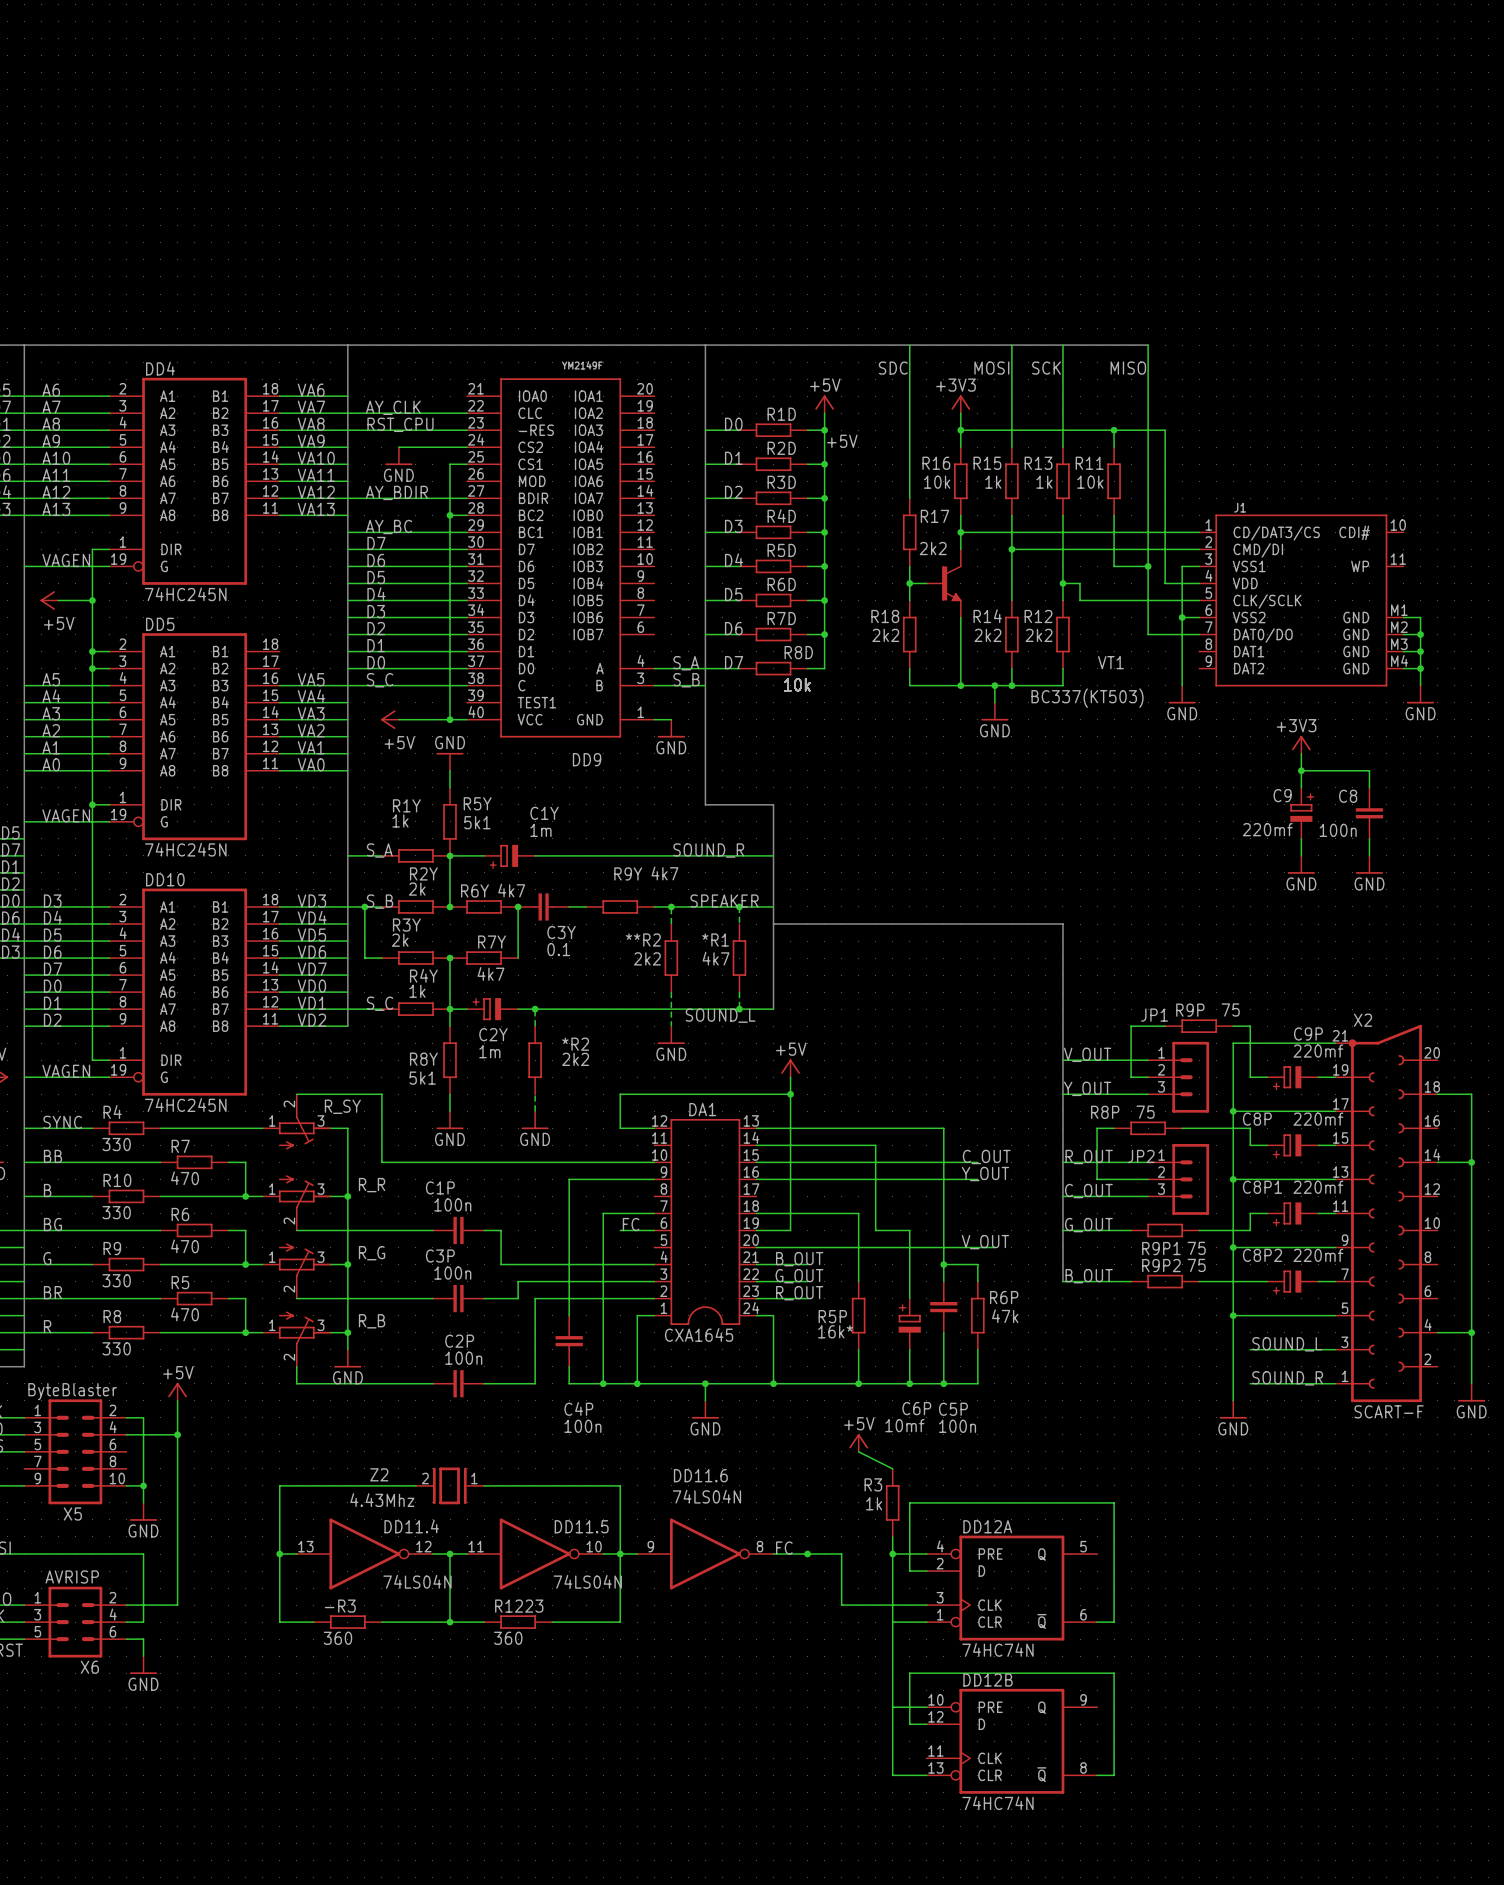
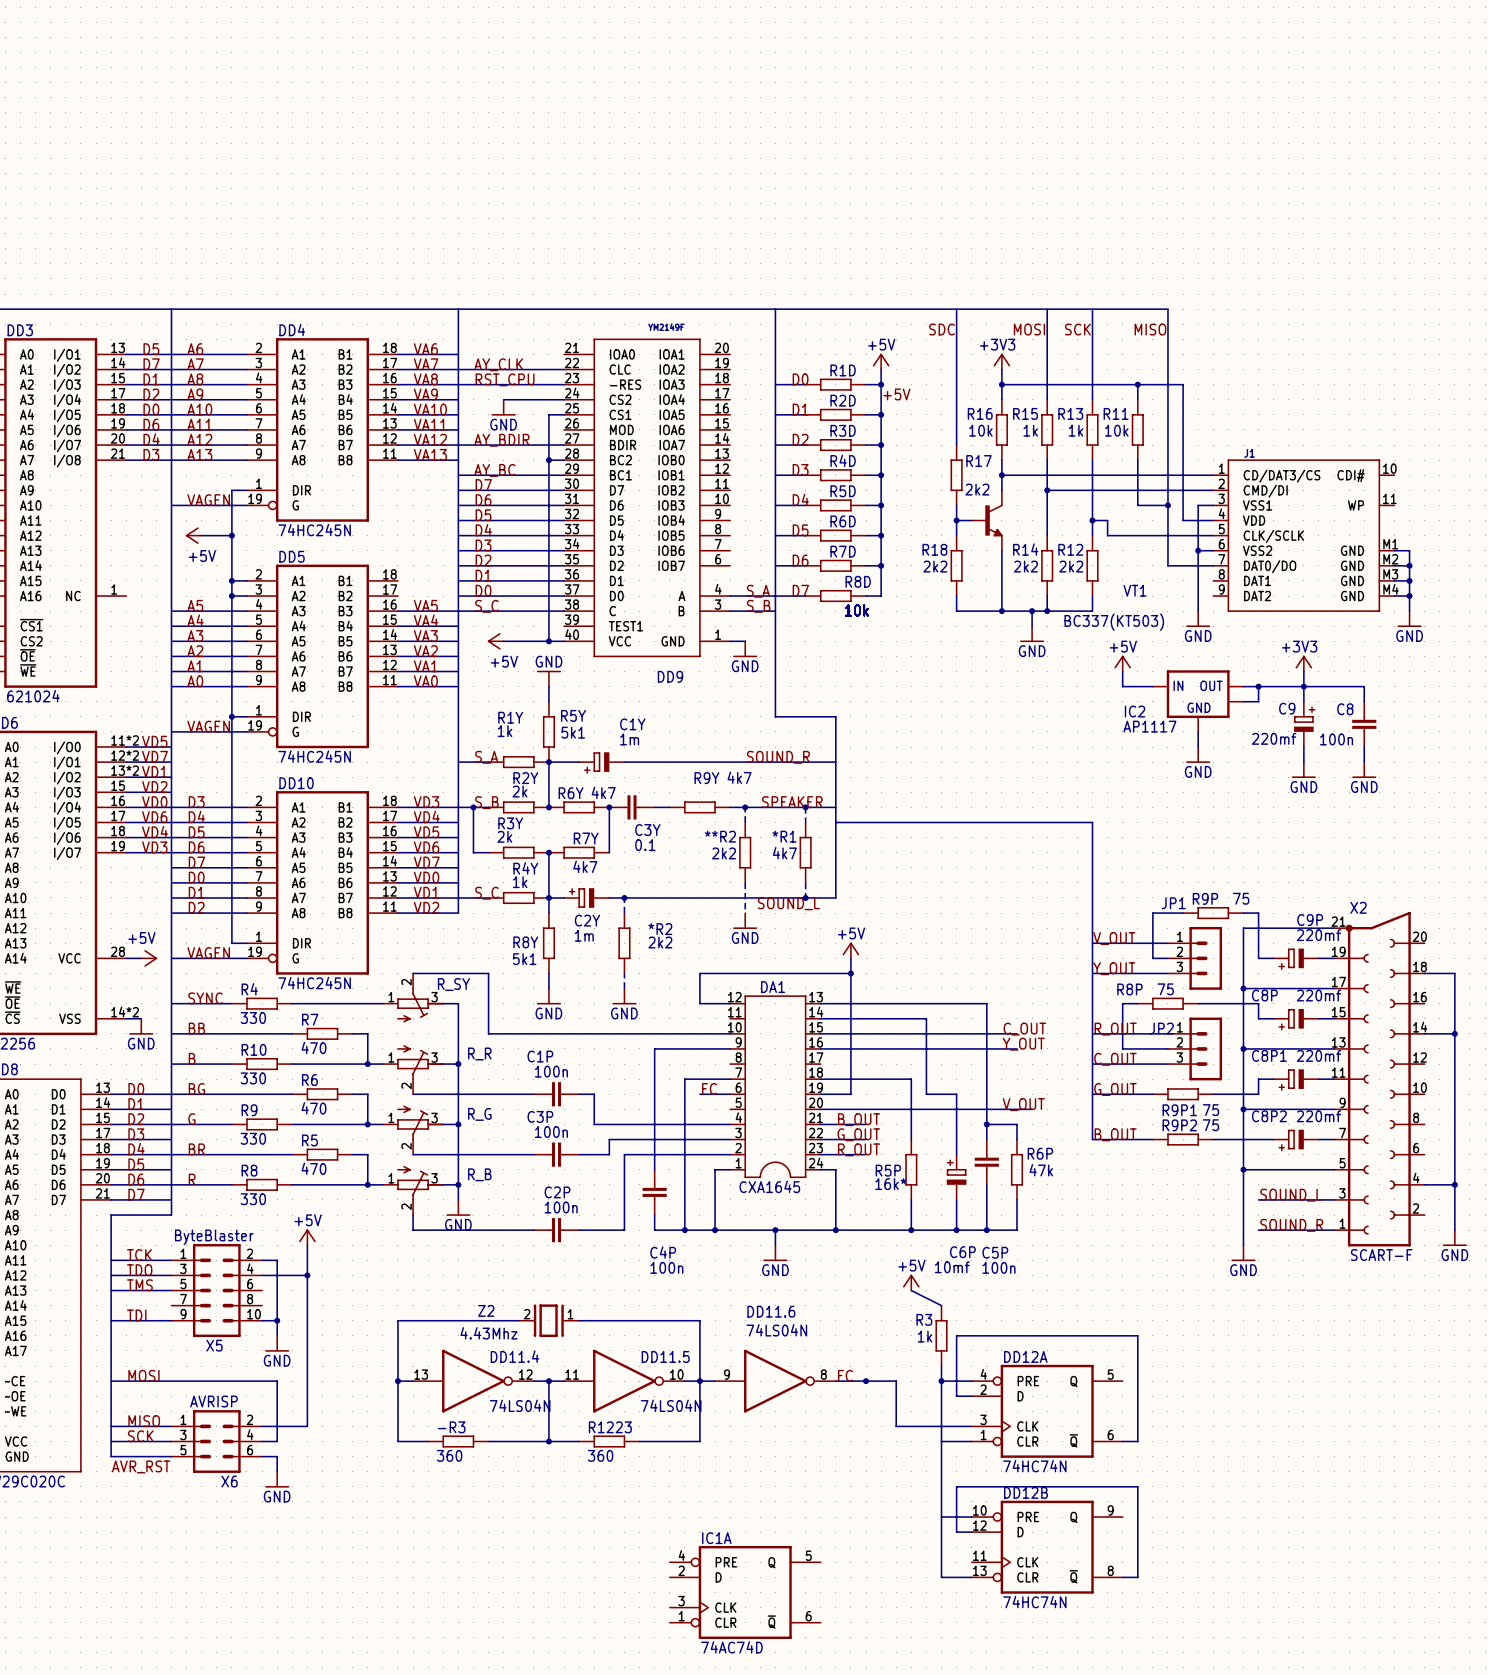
power symbol: none -> +5V (1122, 663)
wire: none -> (1122, 671) (1122, 686) (1152, 686)
wire: none -> (1243, 686) (1303, 686)
wire: none -> (1258, 686) (1258, 701) (1243, 701)
junction: none -> (1258, 686)
IC2: none -> AP1117 (1198, 701)
wire: none -> (1198, 731) (1198, 747)
power symbol: none -> GND (1198, 754)
IC1A: none -> 74AC74D (745, 1592)

